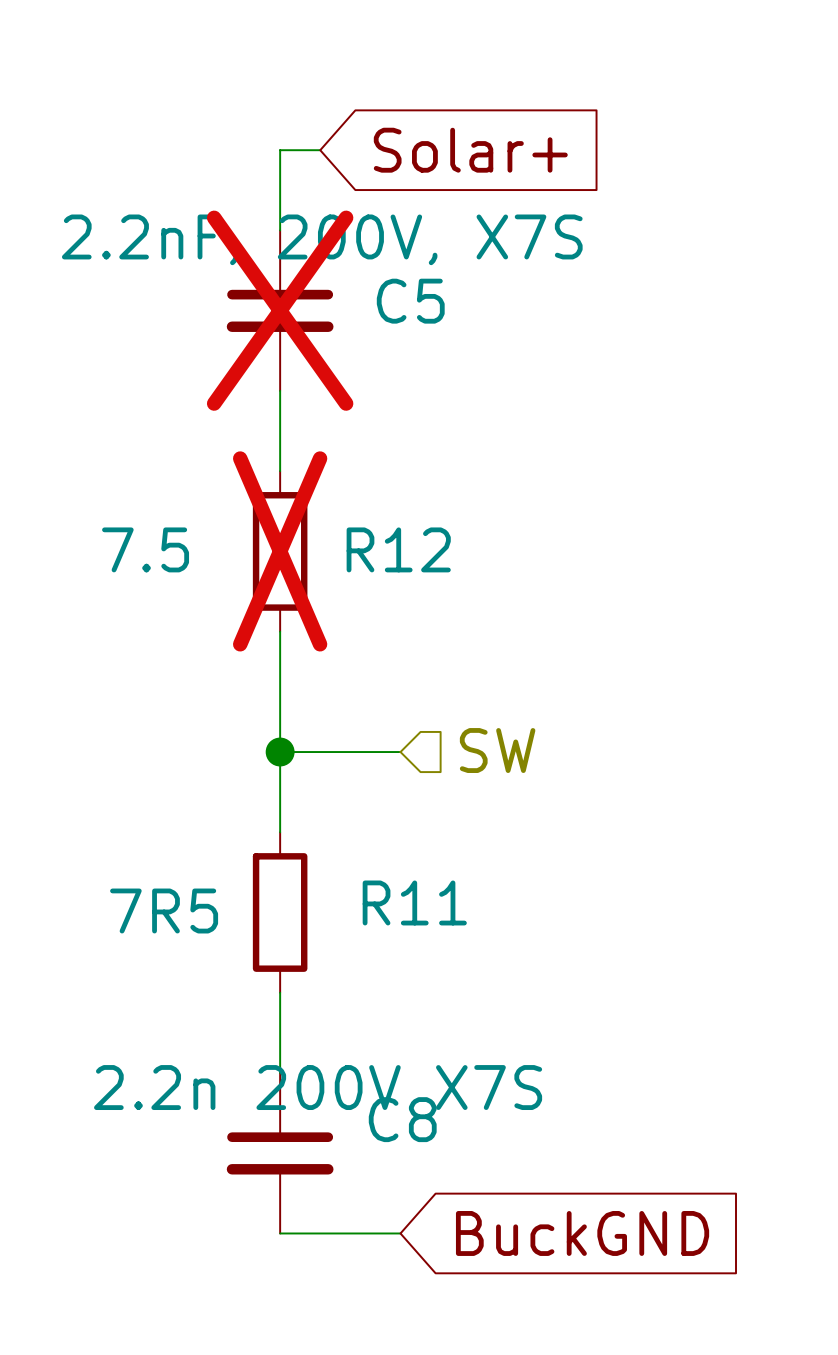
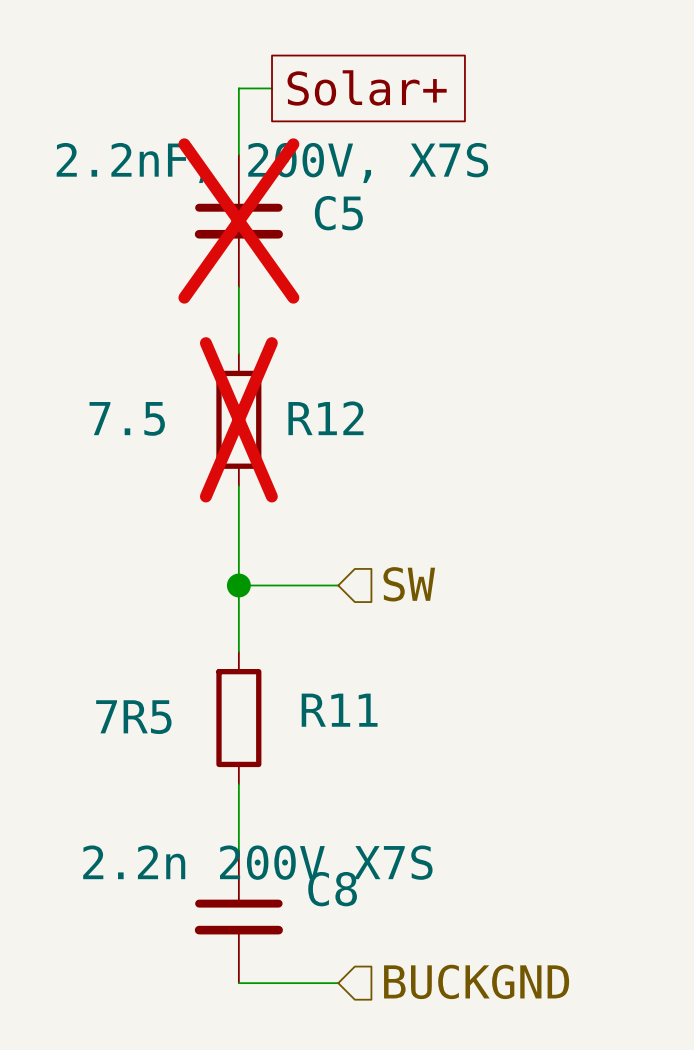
global label shape: input (470, 150) -> passive (367, 87)
hierarchical label: none -> BUCKGND (476, 981)
global label: BuckGND (582, 1233) -> none

